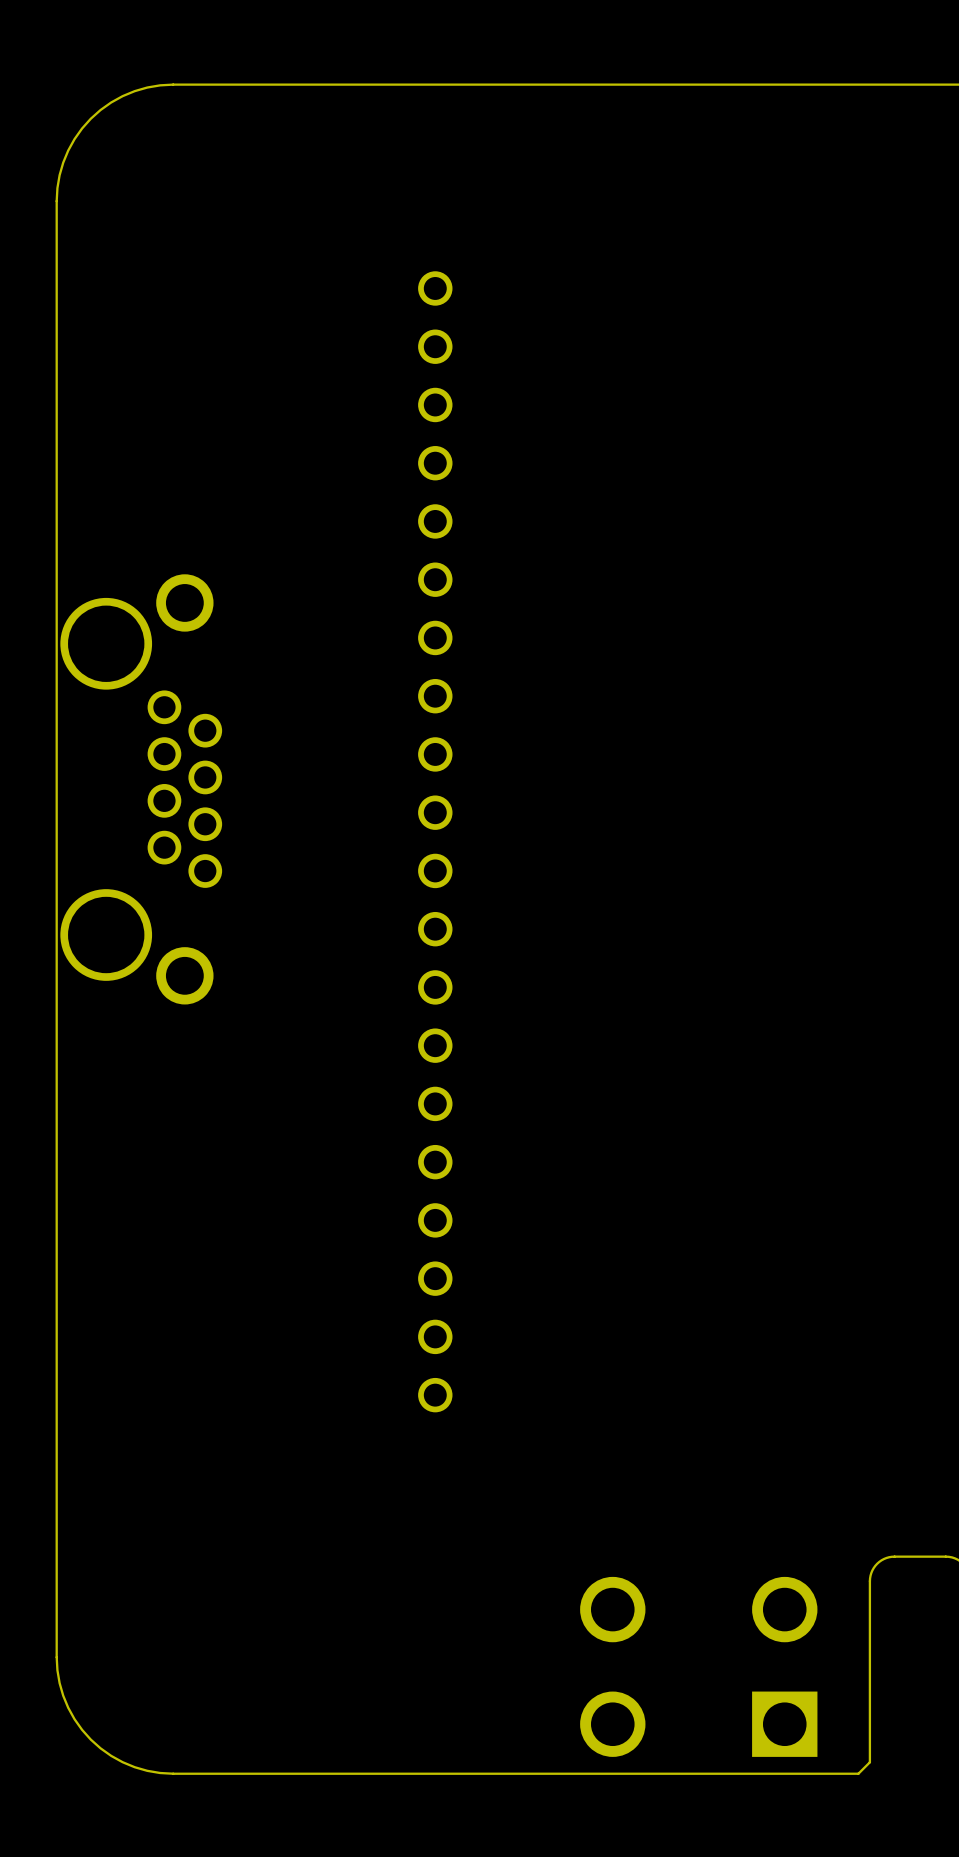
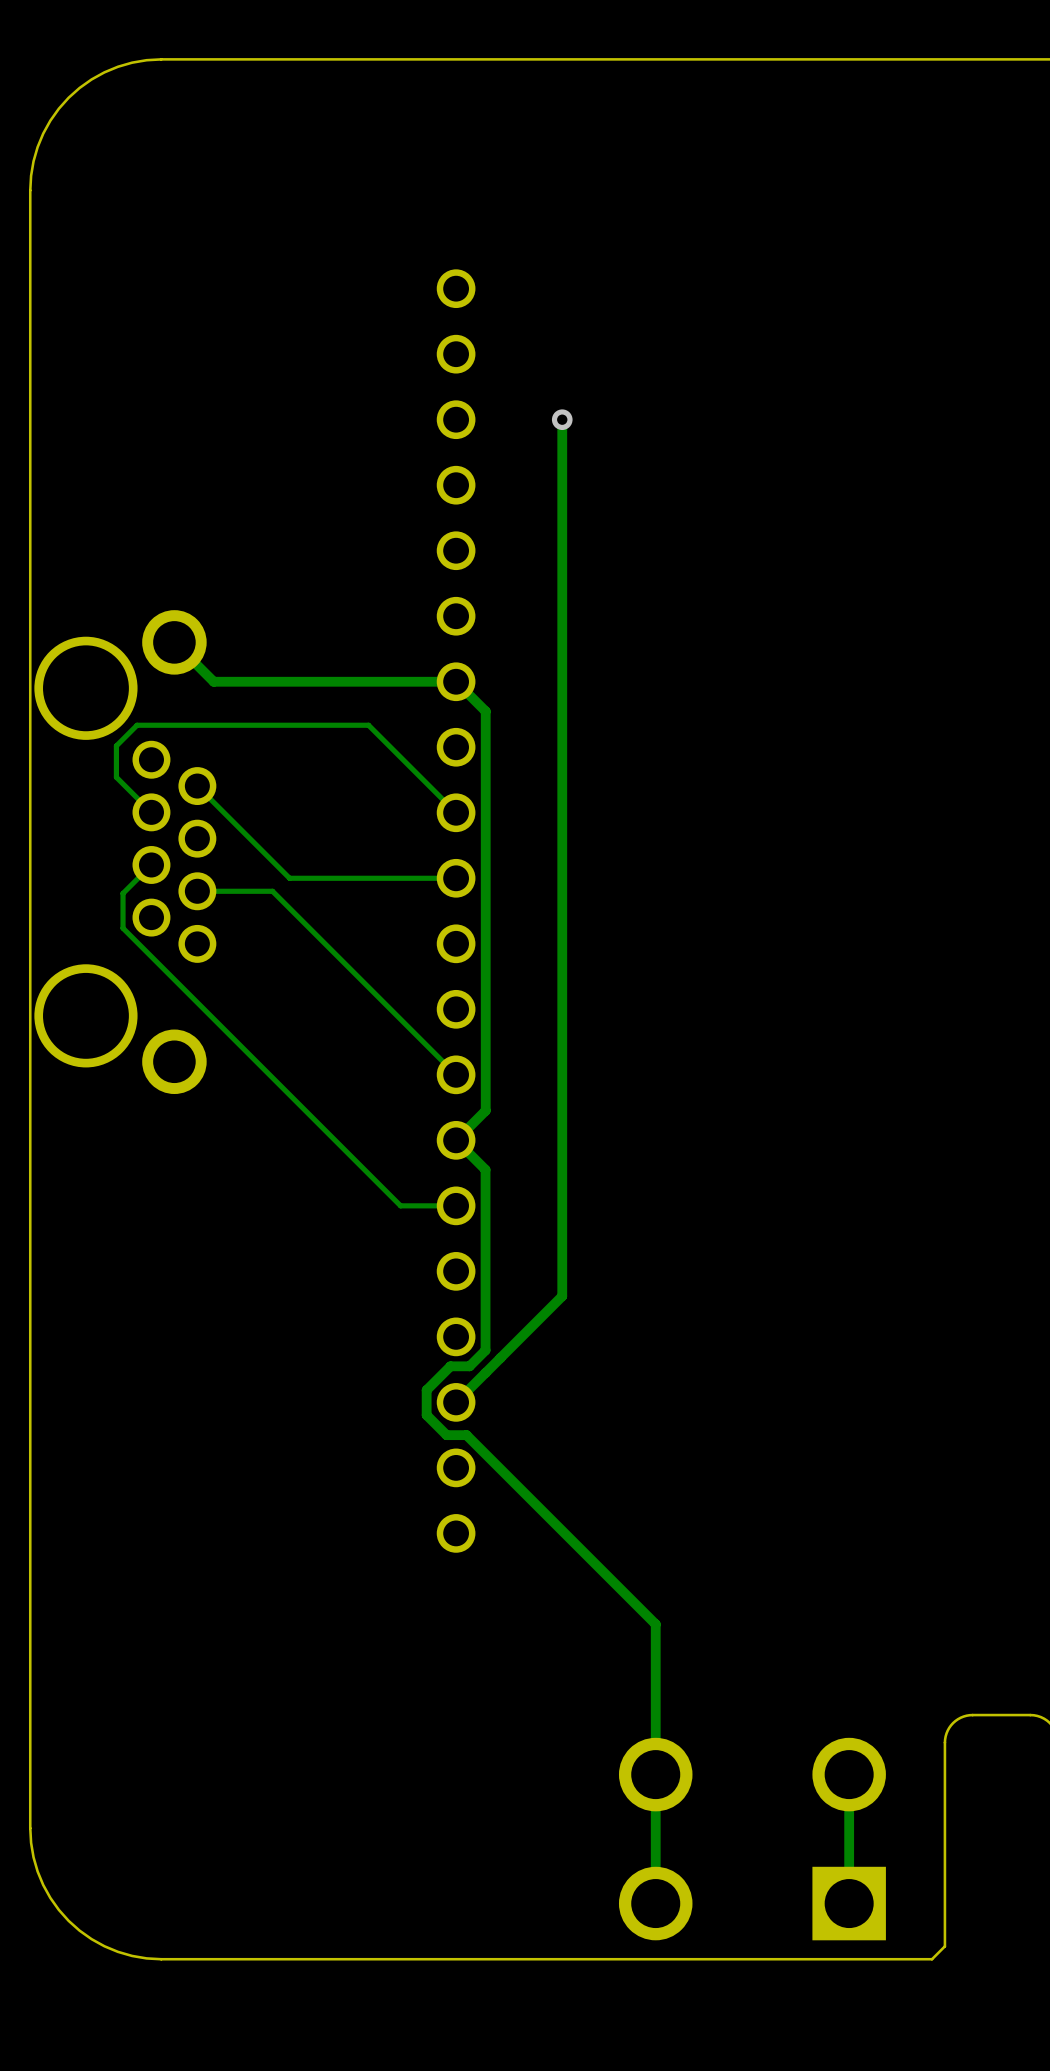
track: none -> (562, 419) (562, 1296) (456, 1402)
via: none -> (562, 419)
track: none -> (174, 642) (213, 681) (456, 681) (485, 711) (485, 1110) (456, 1140) (485, 1169) (485, 1350) (469, 1366) (450, 1366) (426, 1390) (426, 1415) (446, 1435) (466, 1435) (655, 1624) (655, 1903)
track: none -> (197, 786) (289, 878) (456, 878)
track: none -> (151, 812) (116, 777) (116, 745) (137, 725) (368, 725) (456, 812)
track: none -> (151, 864) (123, 893) (123, 928) (400, 1205) (456, 1205)
track: none -> (197, 891) (272, 891) (456, 1074)
track: none -> (849, 1774) (849, 1903)

